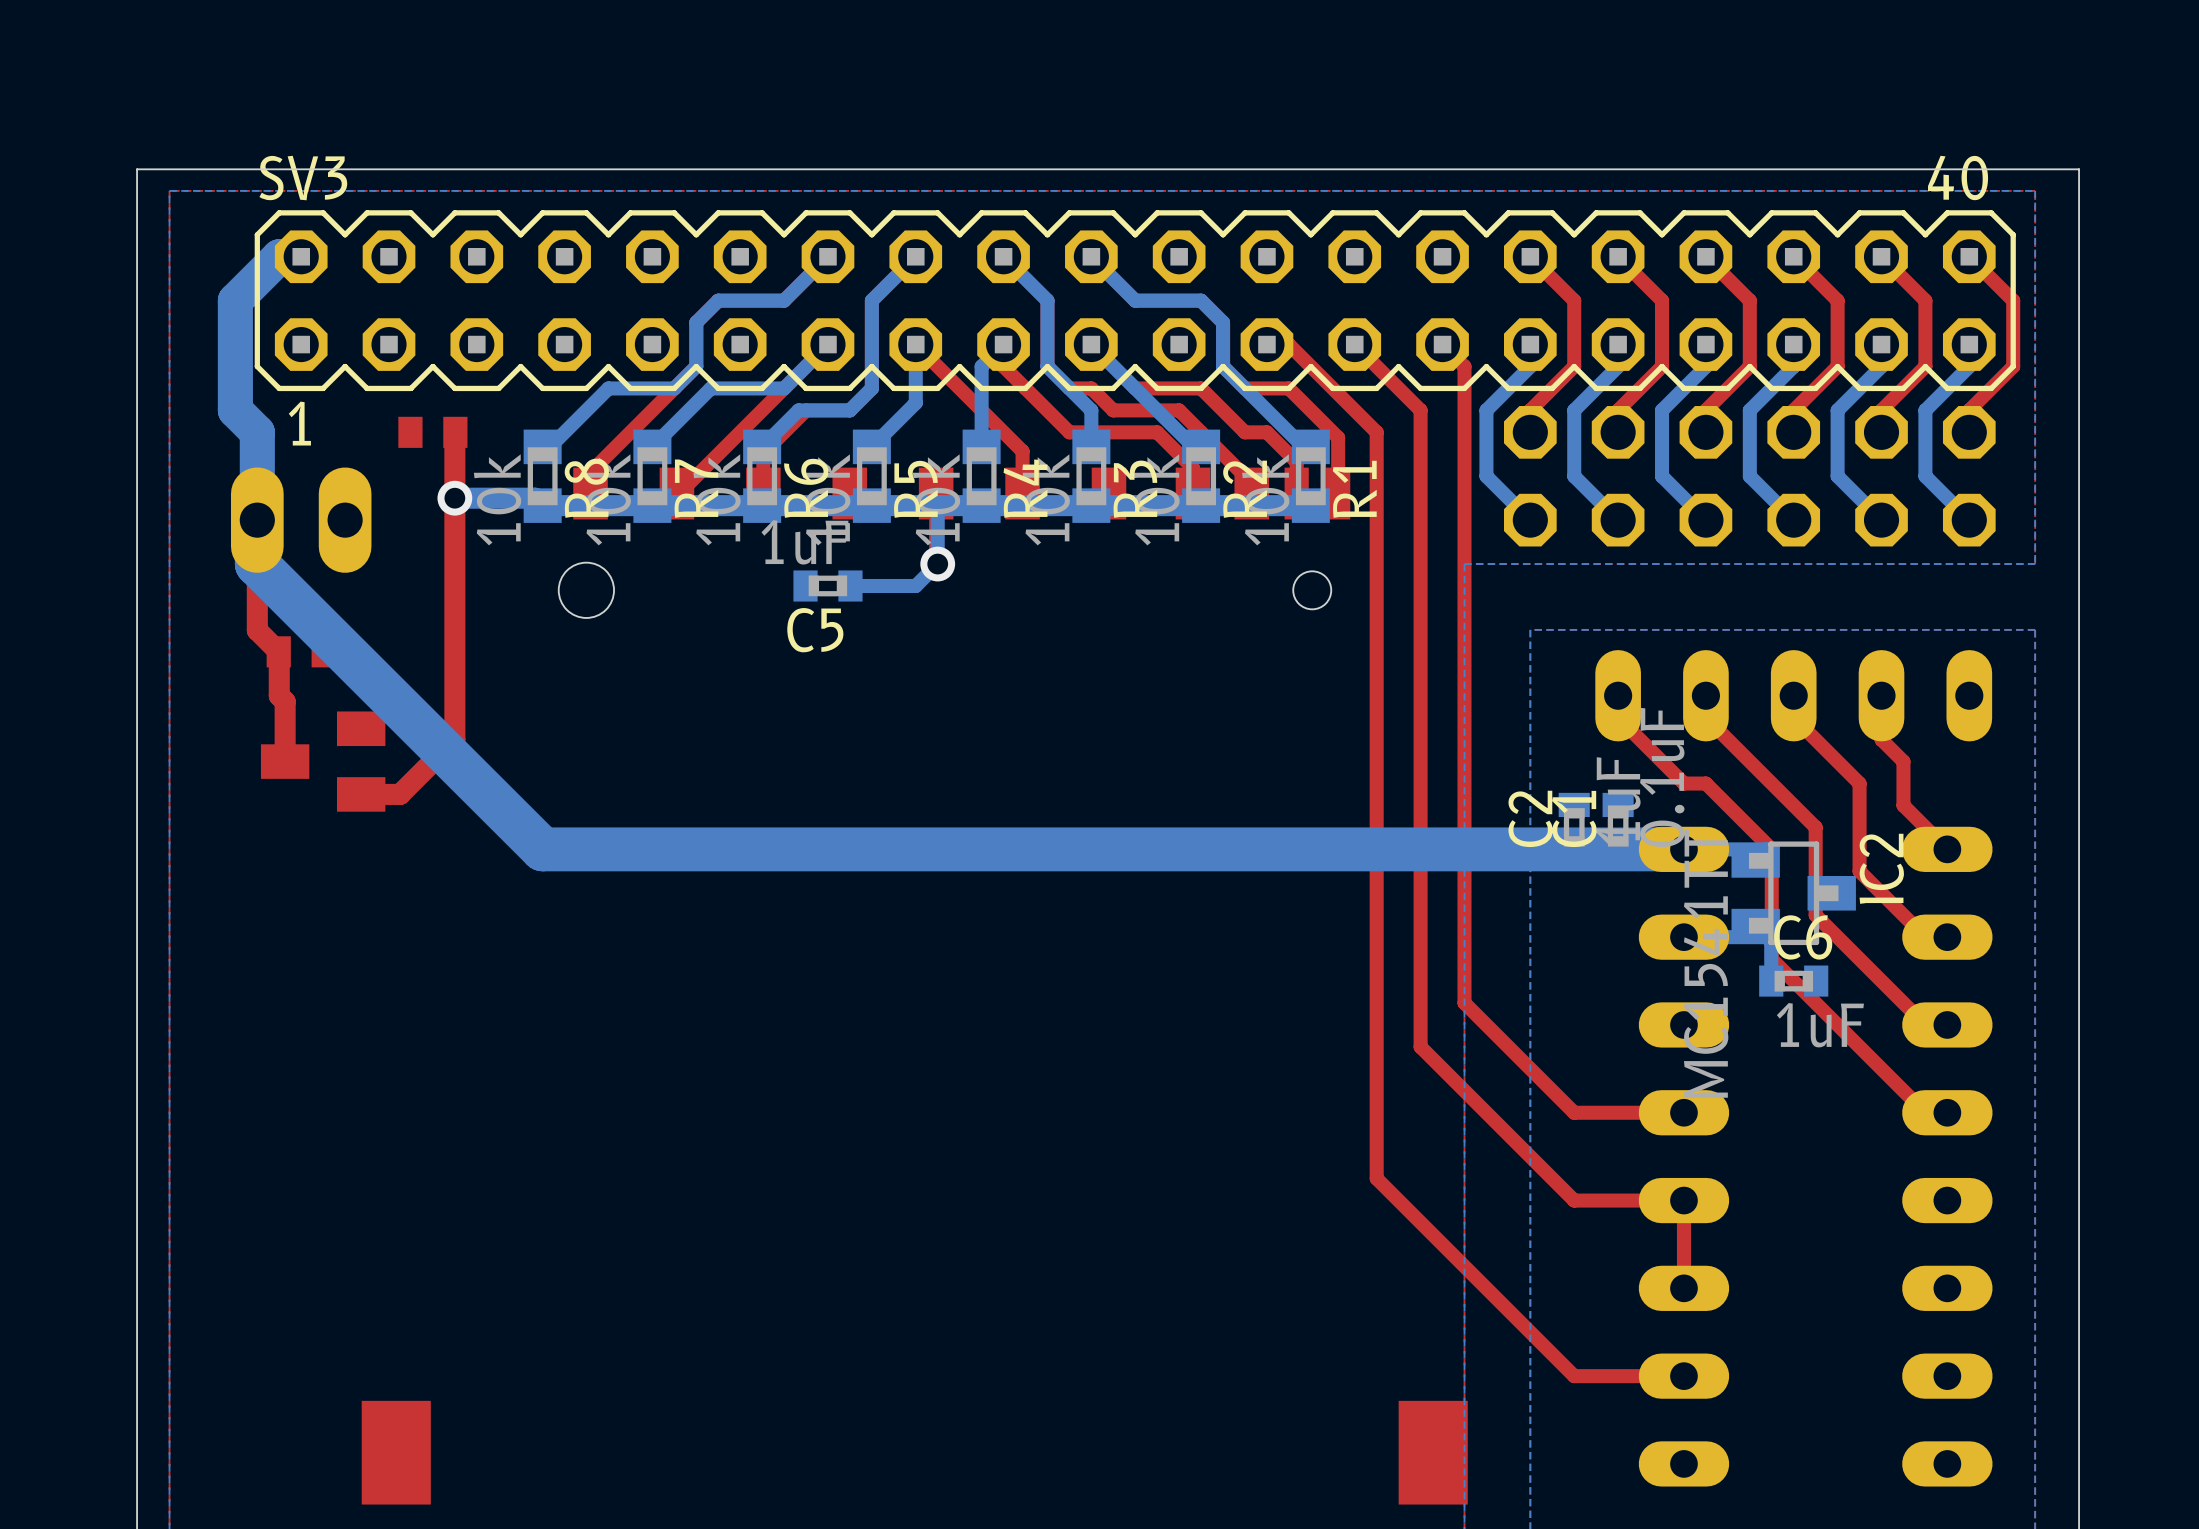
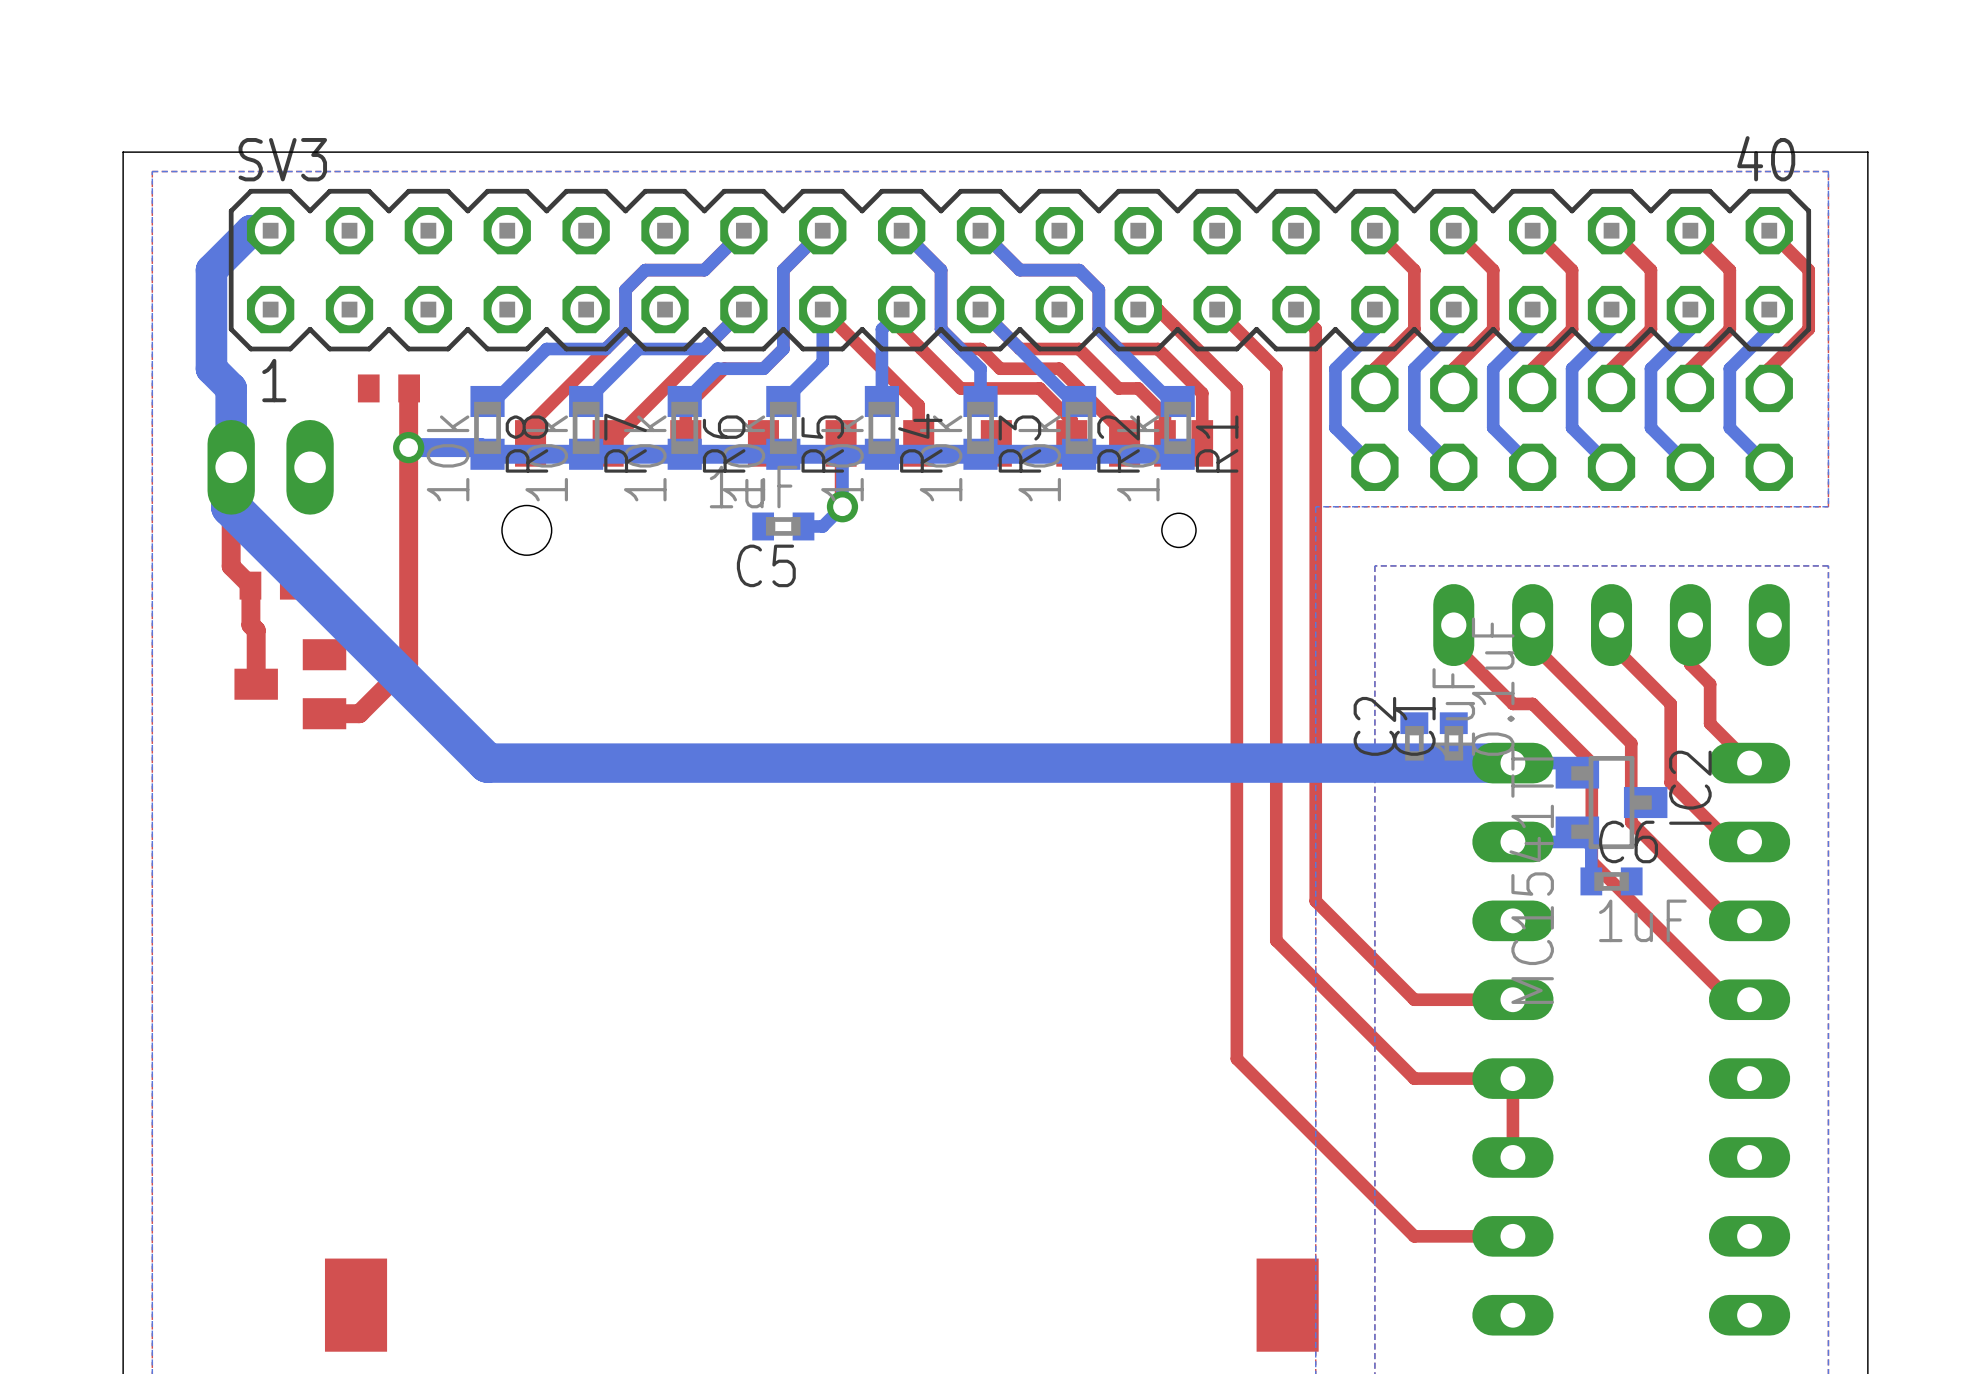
C5 position: (827, 585) -> (783, 526)
bottom track: (894, 585) (850, 585) -> none

